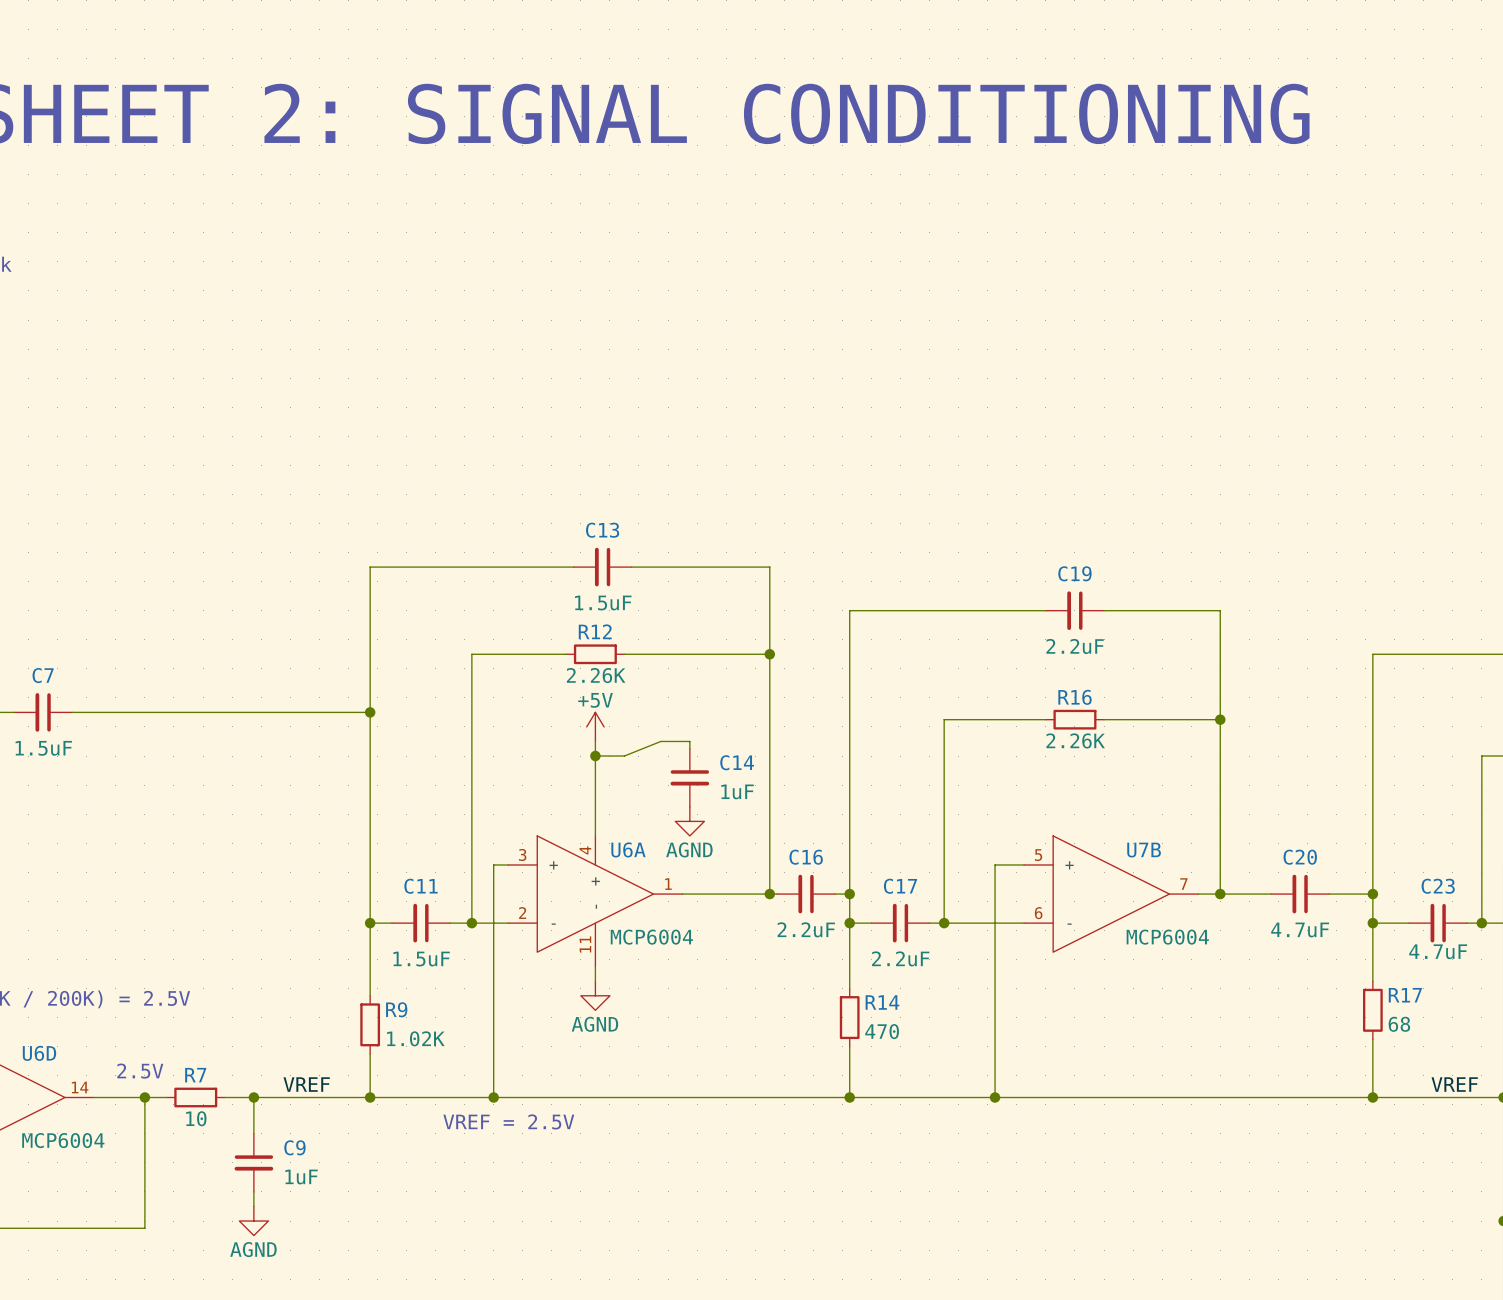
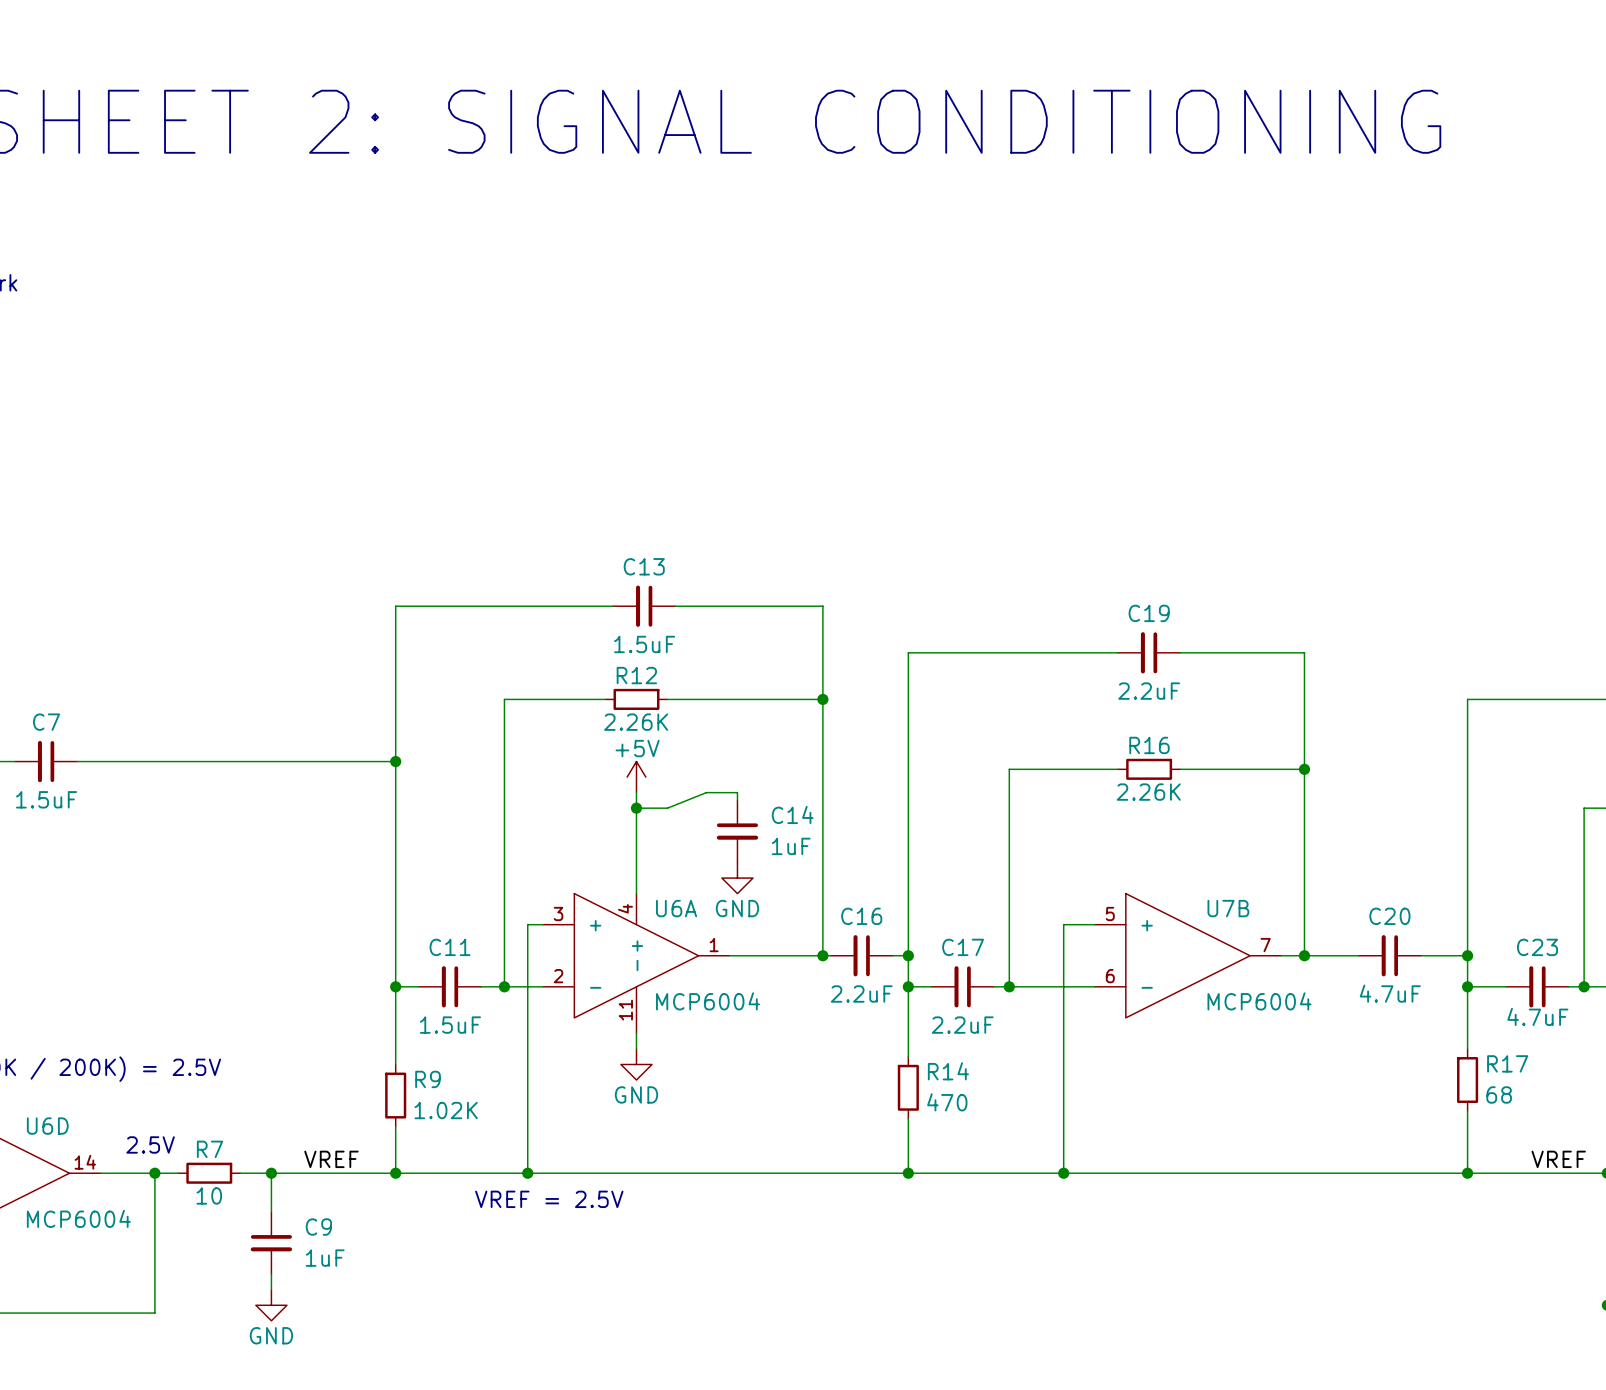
power symbol: AGND (689, 821) -> GND (737, 878)
power symbol: AGND (595, 995) -> GND (636, 1064)
power symbol: AGND (253, 1221) -> GND (271, 1305)

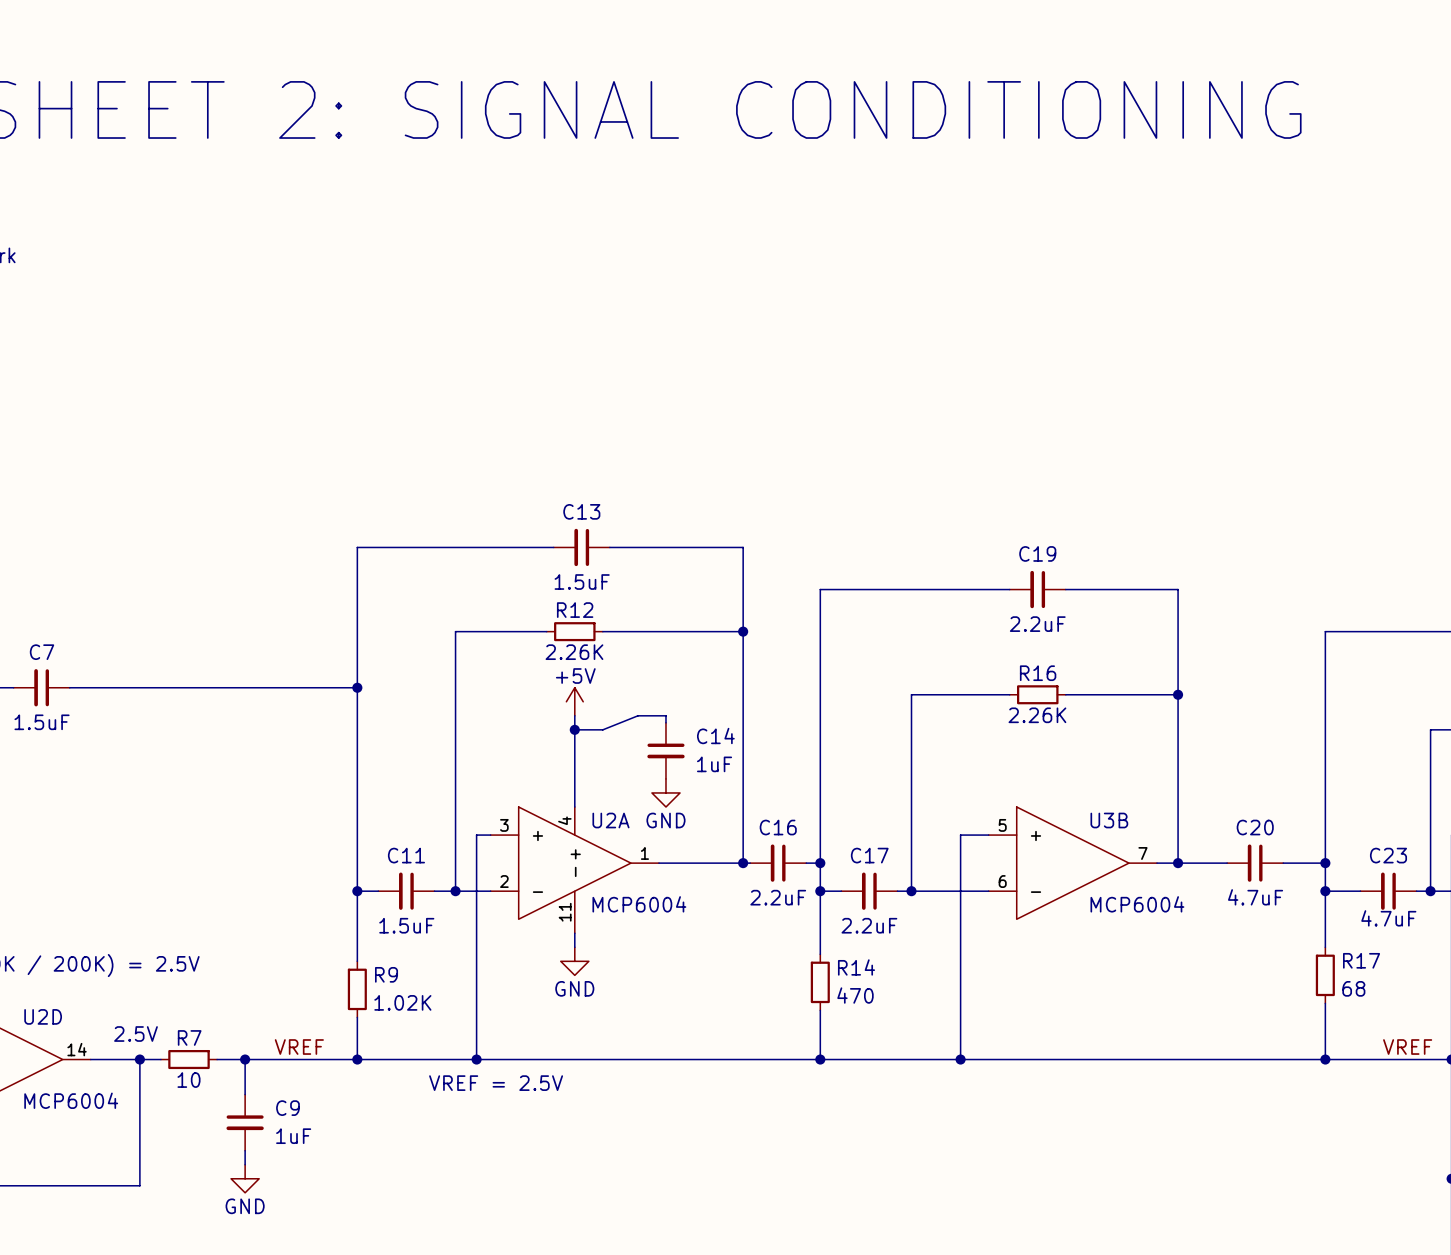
U6A name: U6A (676, 908) -> U2A (610, 820)
U7B name: U7B (1228, 908) -> U3B (1109, 820)
U6D name: U6D (47, 1126) -> U2D (43, 1016)

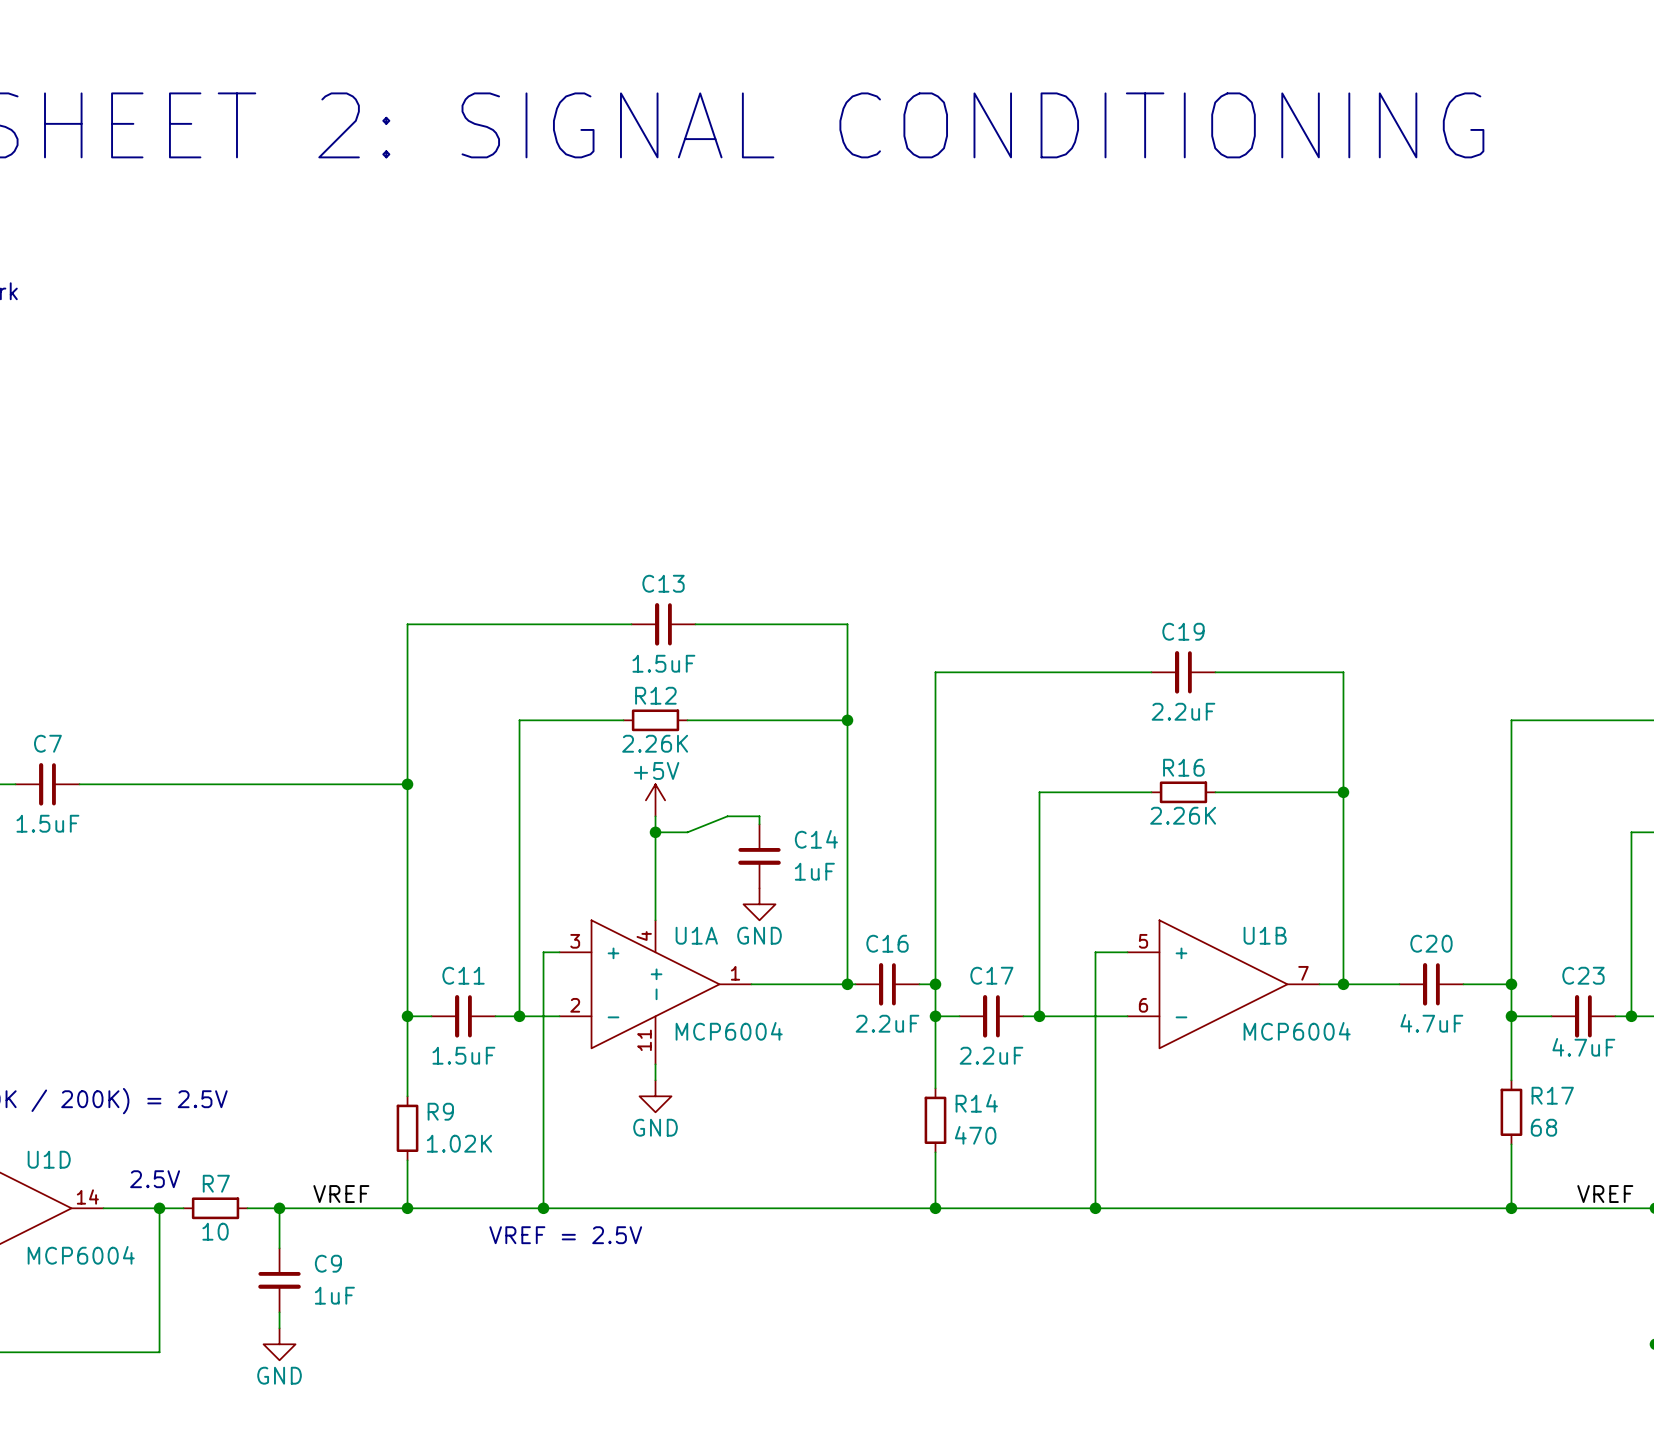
U2A name: U2A (610, 820) -> U1A (696, 935)
U3B name: U3B (1109, 820) -> U1B (1265, 935)
U2D name: U2D (43, 1016) -> U1D (49, 1159)

